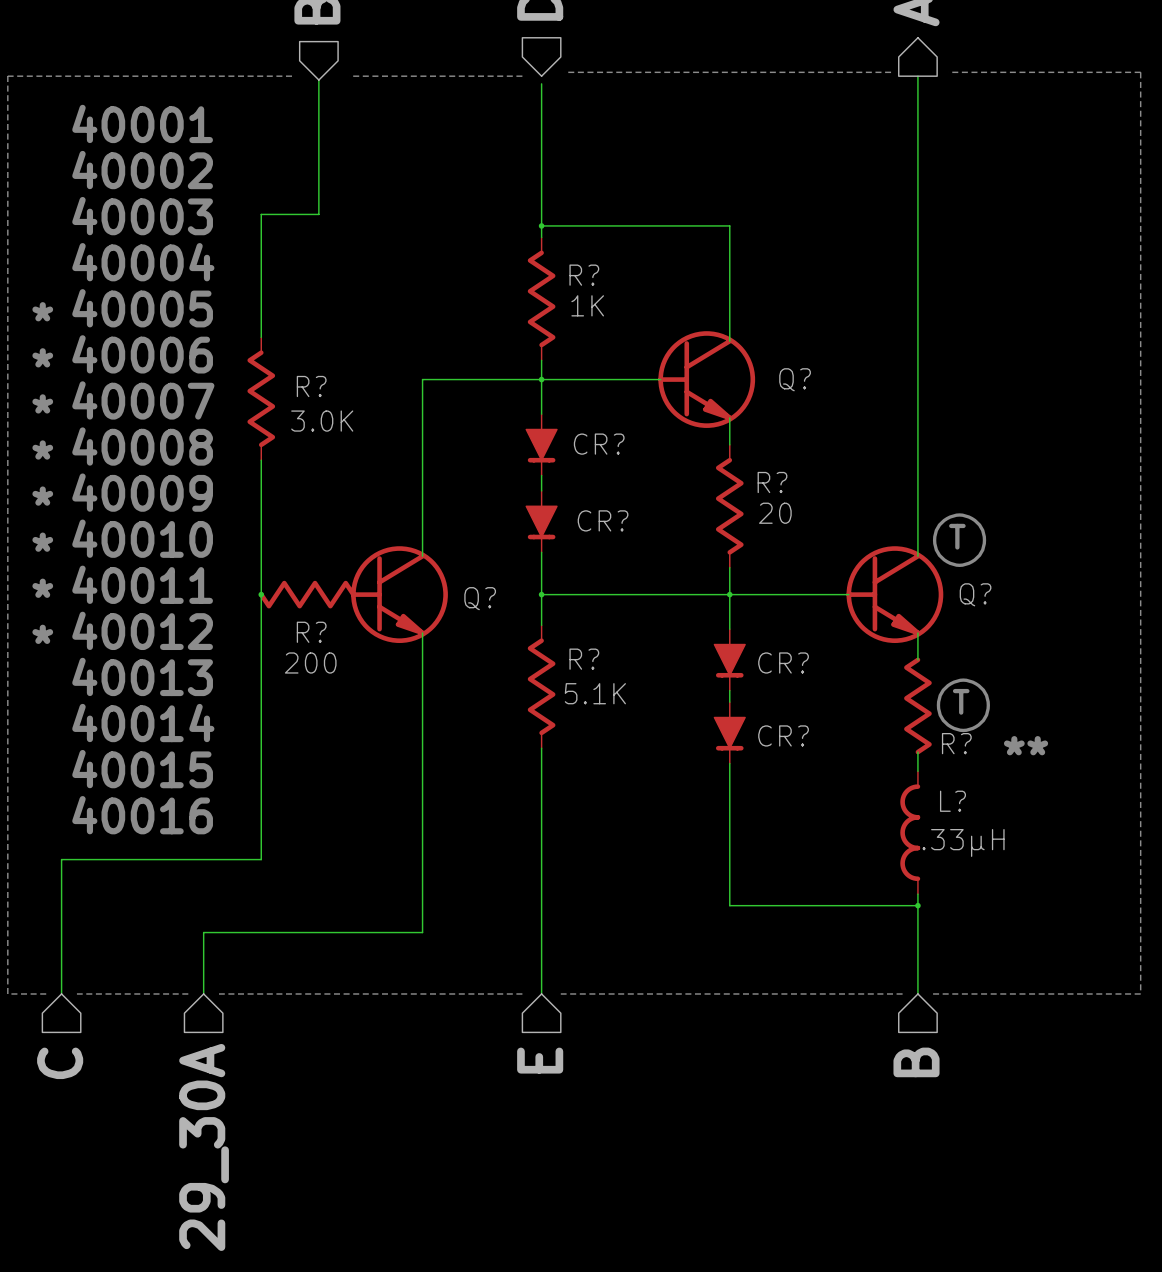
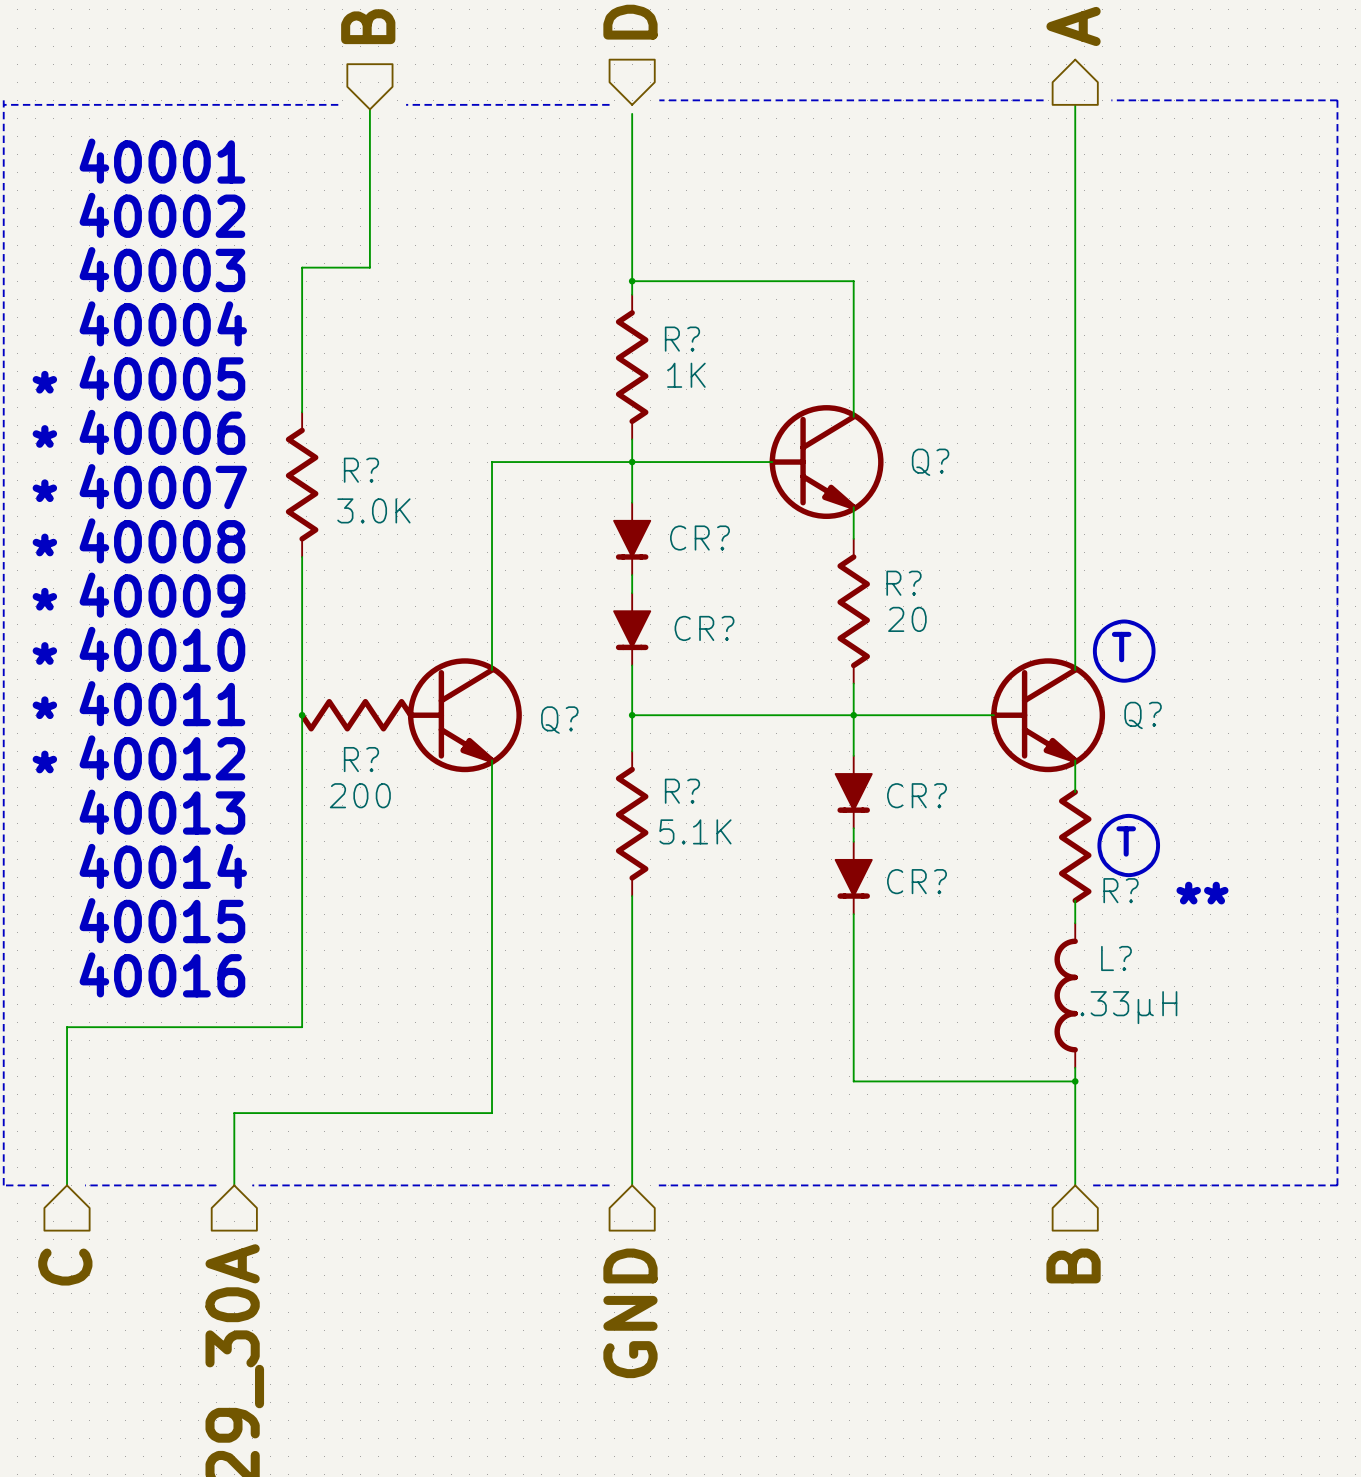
hierarchical label: E (540, 1060) -> GND (630, 1313)

